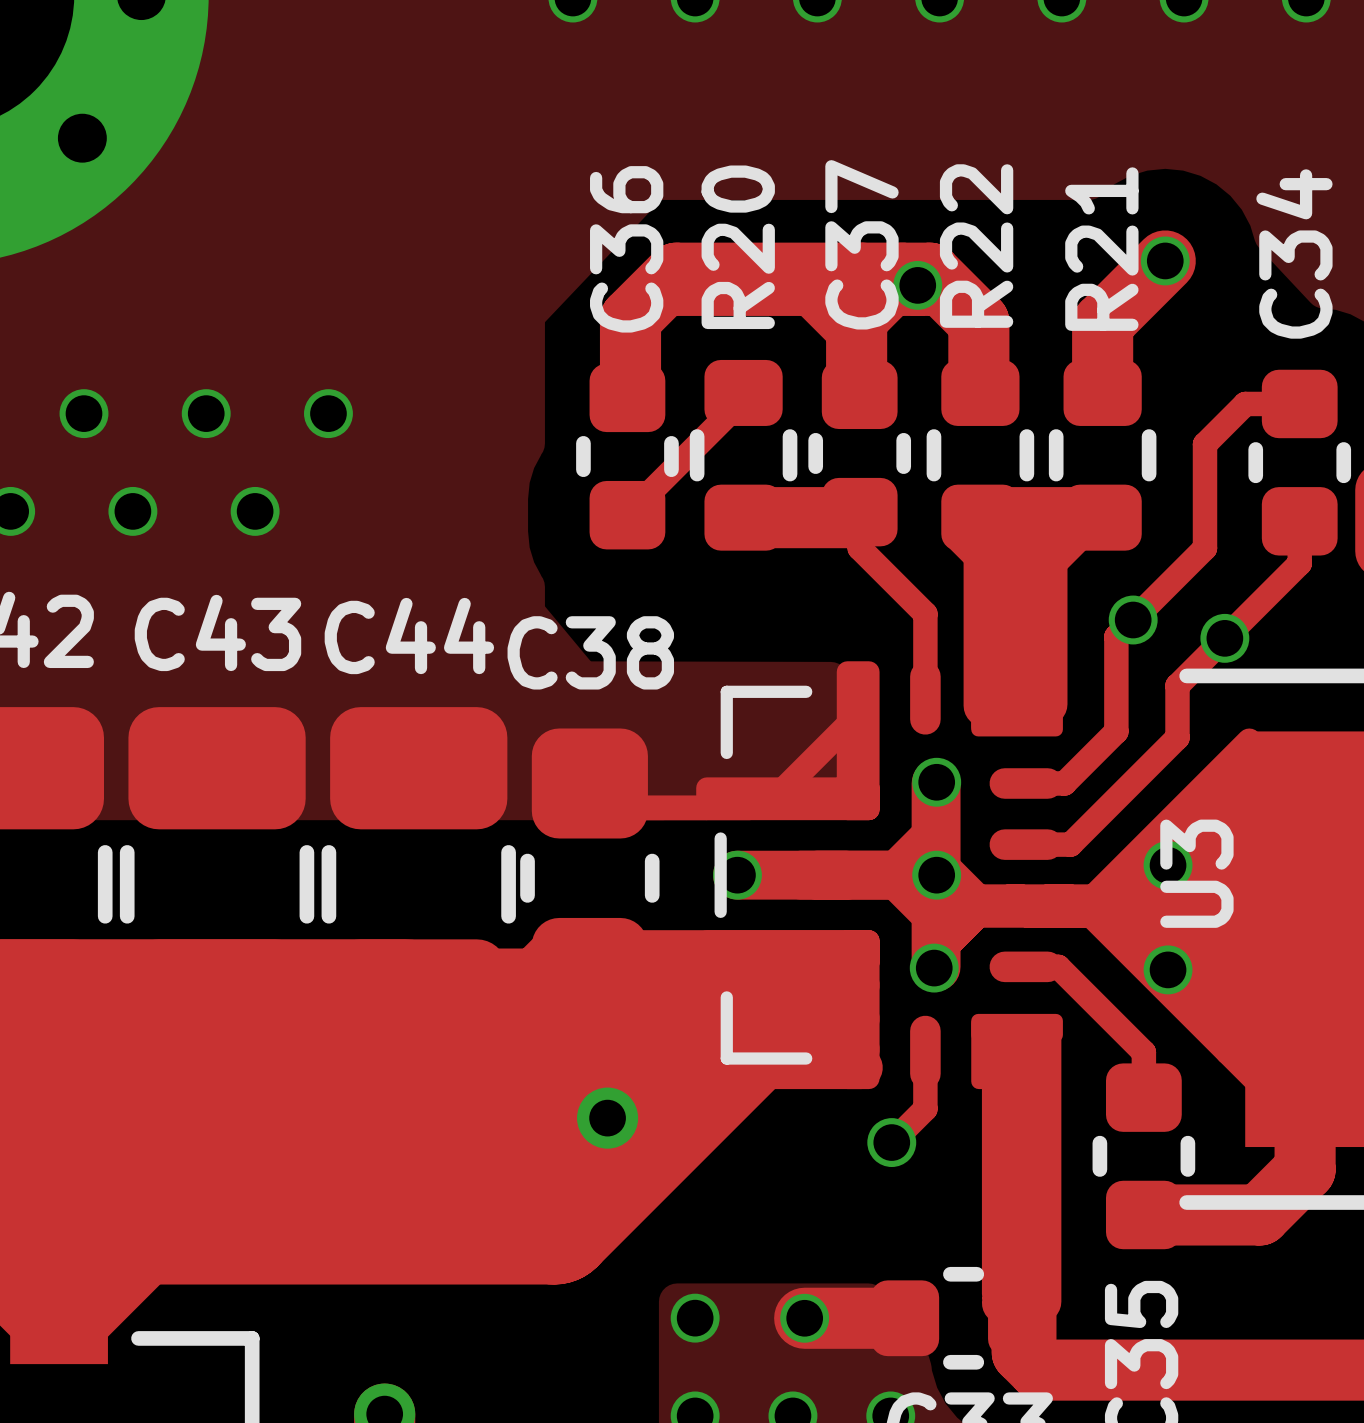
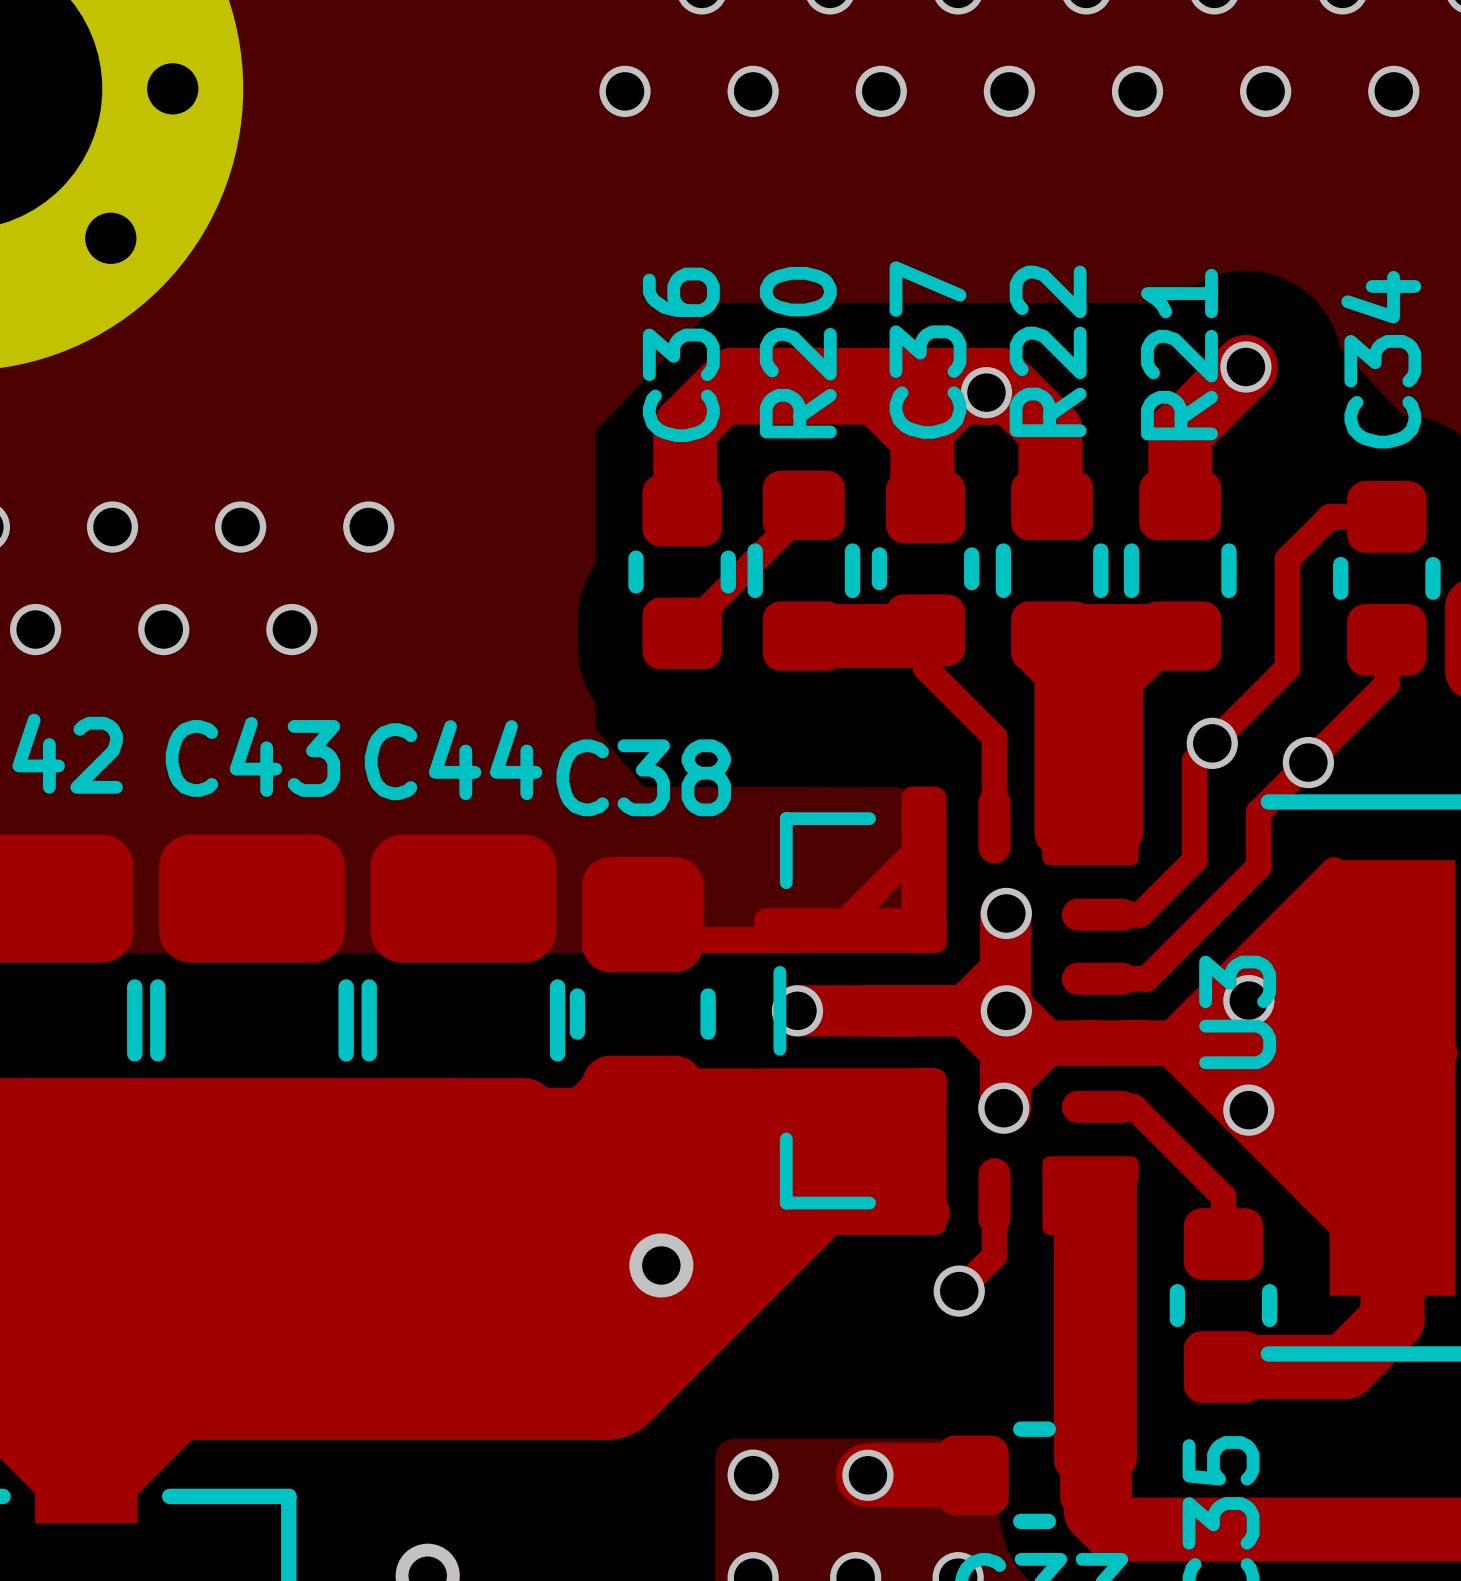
U3 name position: U3 (1196, 873) -> U3 (1237, 1012)

